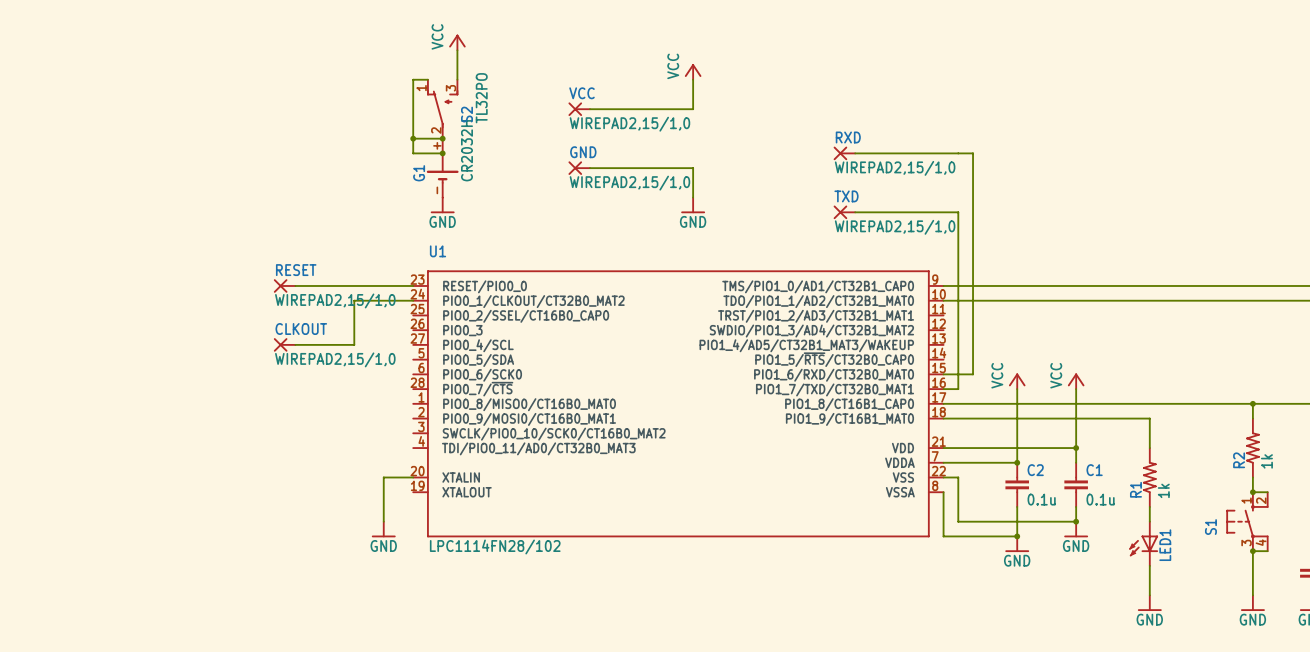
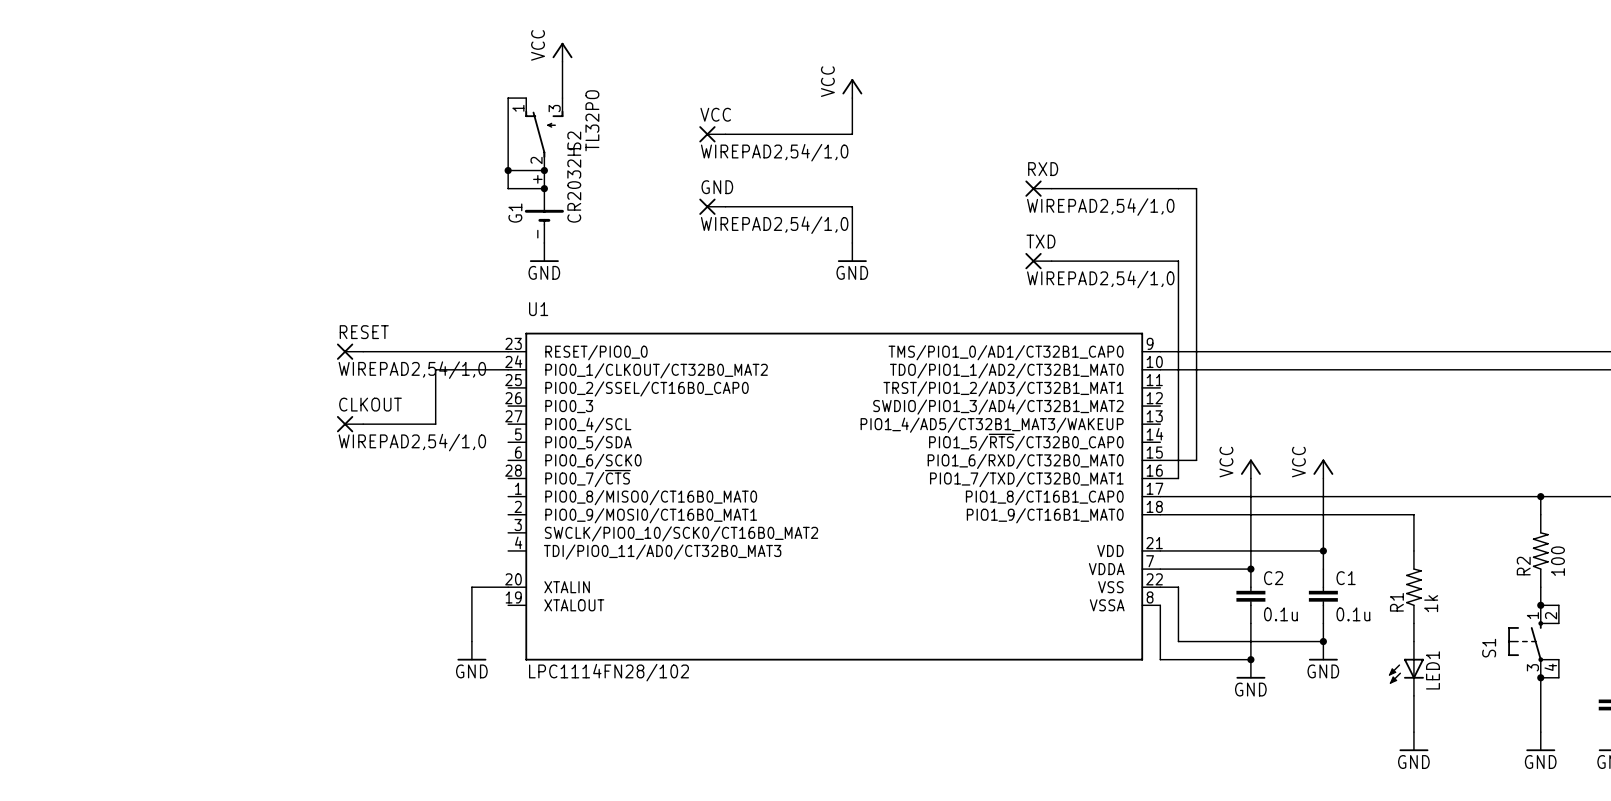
VCC value: WIREPAD2,15/1,0 (629, 124) -> WIREPAD2,54/1,0 (774, 152)
RXD value: WIREPAD2,15/1,0 (895, 168) -> WIREPAD2,54/1,0 (1100, 207)
GND value: WIREPAD2,15/1,0 (629, 183) -> WIREPAD2,54/1,0 (774, 225)
TXD value: WIREPAD2,15/1,0 (895, 227) -> WIREPAD2,54/1,0 (1100, 279)
RESET value: WIREPAD2,15/1,0 (335, 300) -> WIREPAD2,54/1,0 (412, 370)
CLKOUT value: WIREPAD2,15/1,0 (335, 359) -> WIREPAD2,54/1,0 (412, 442)
R2 value: 1k (1266, 461) -> 100 (1557, 561)

